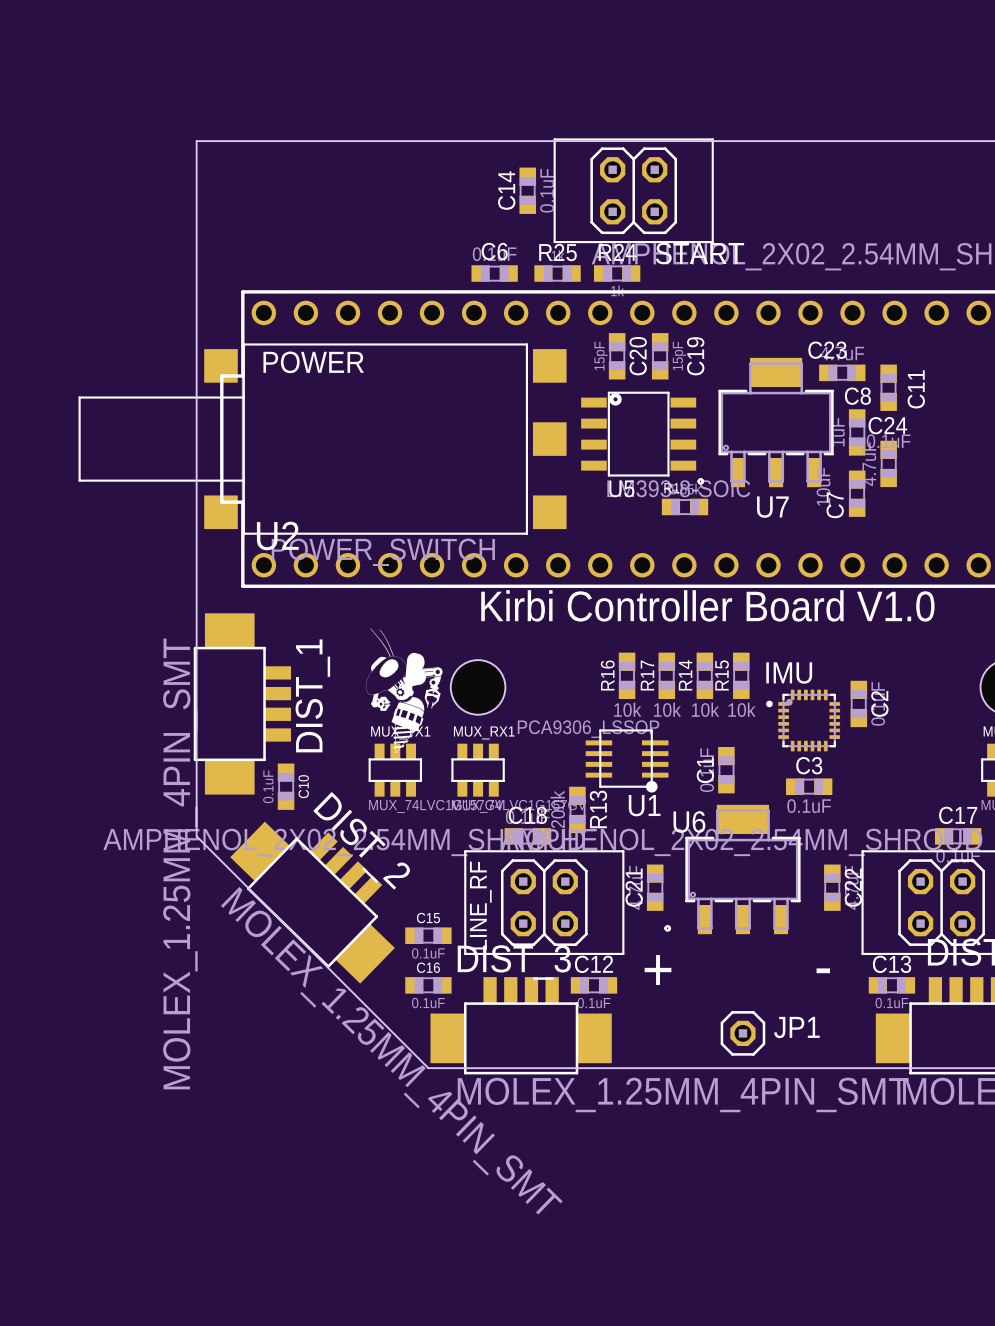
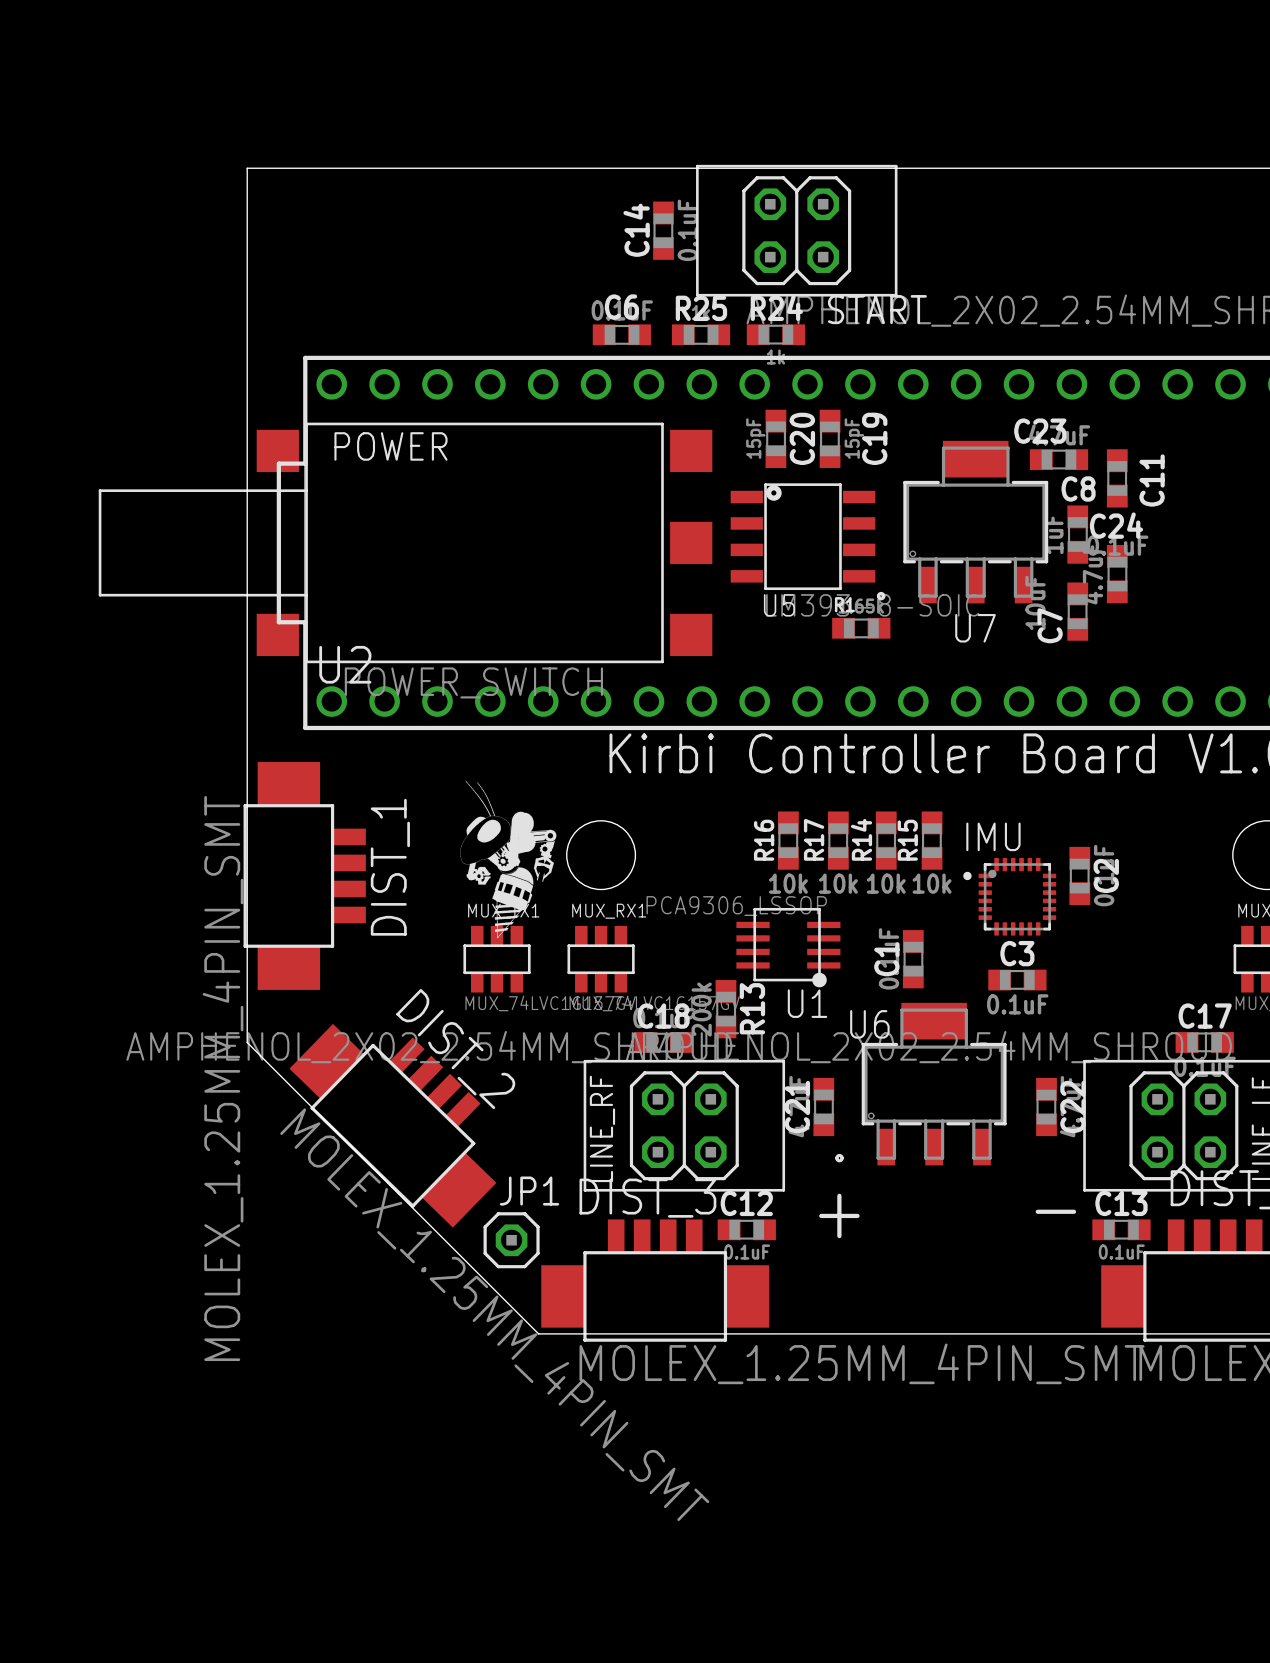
C10: 0.1uF (286, 786) -> none
C15: 0.1uF (428, 935) -> none
C16: 0.1uF (428, 985) -> none
JP1 name position: JP1 (796, 1027) -> JP1 (529, 1191)
JP1 position: (742, 1033) -> (511, 1240)

